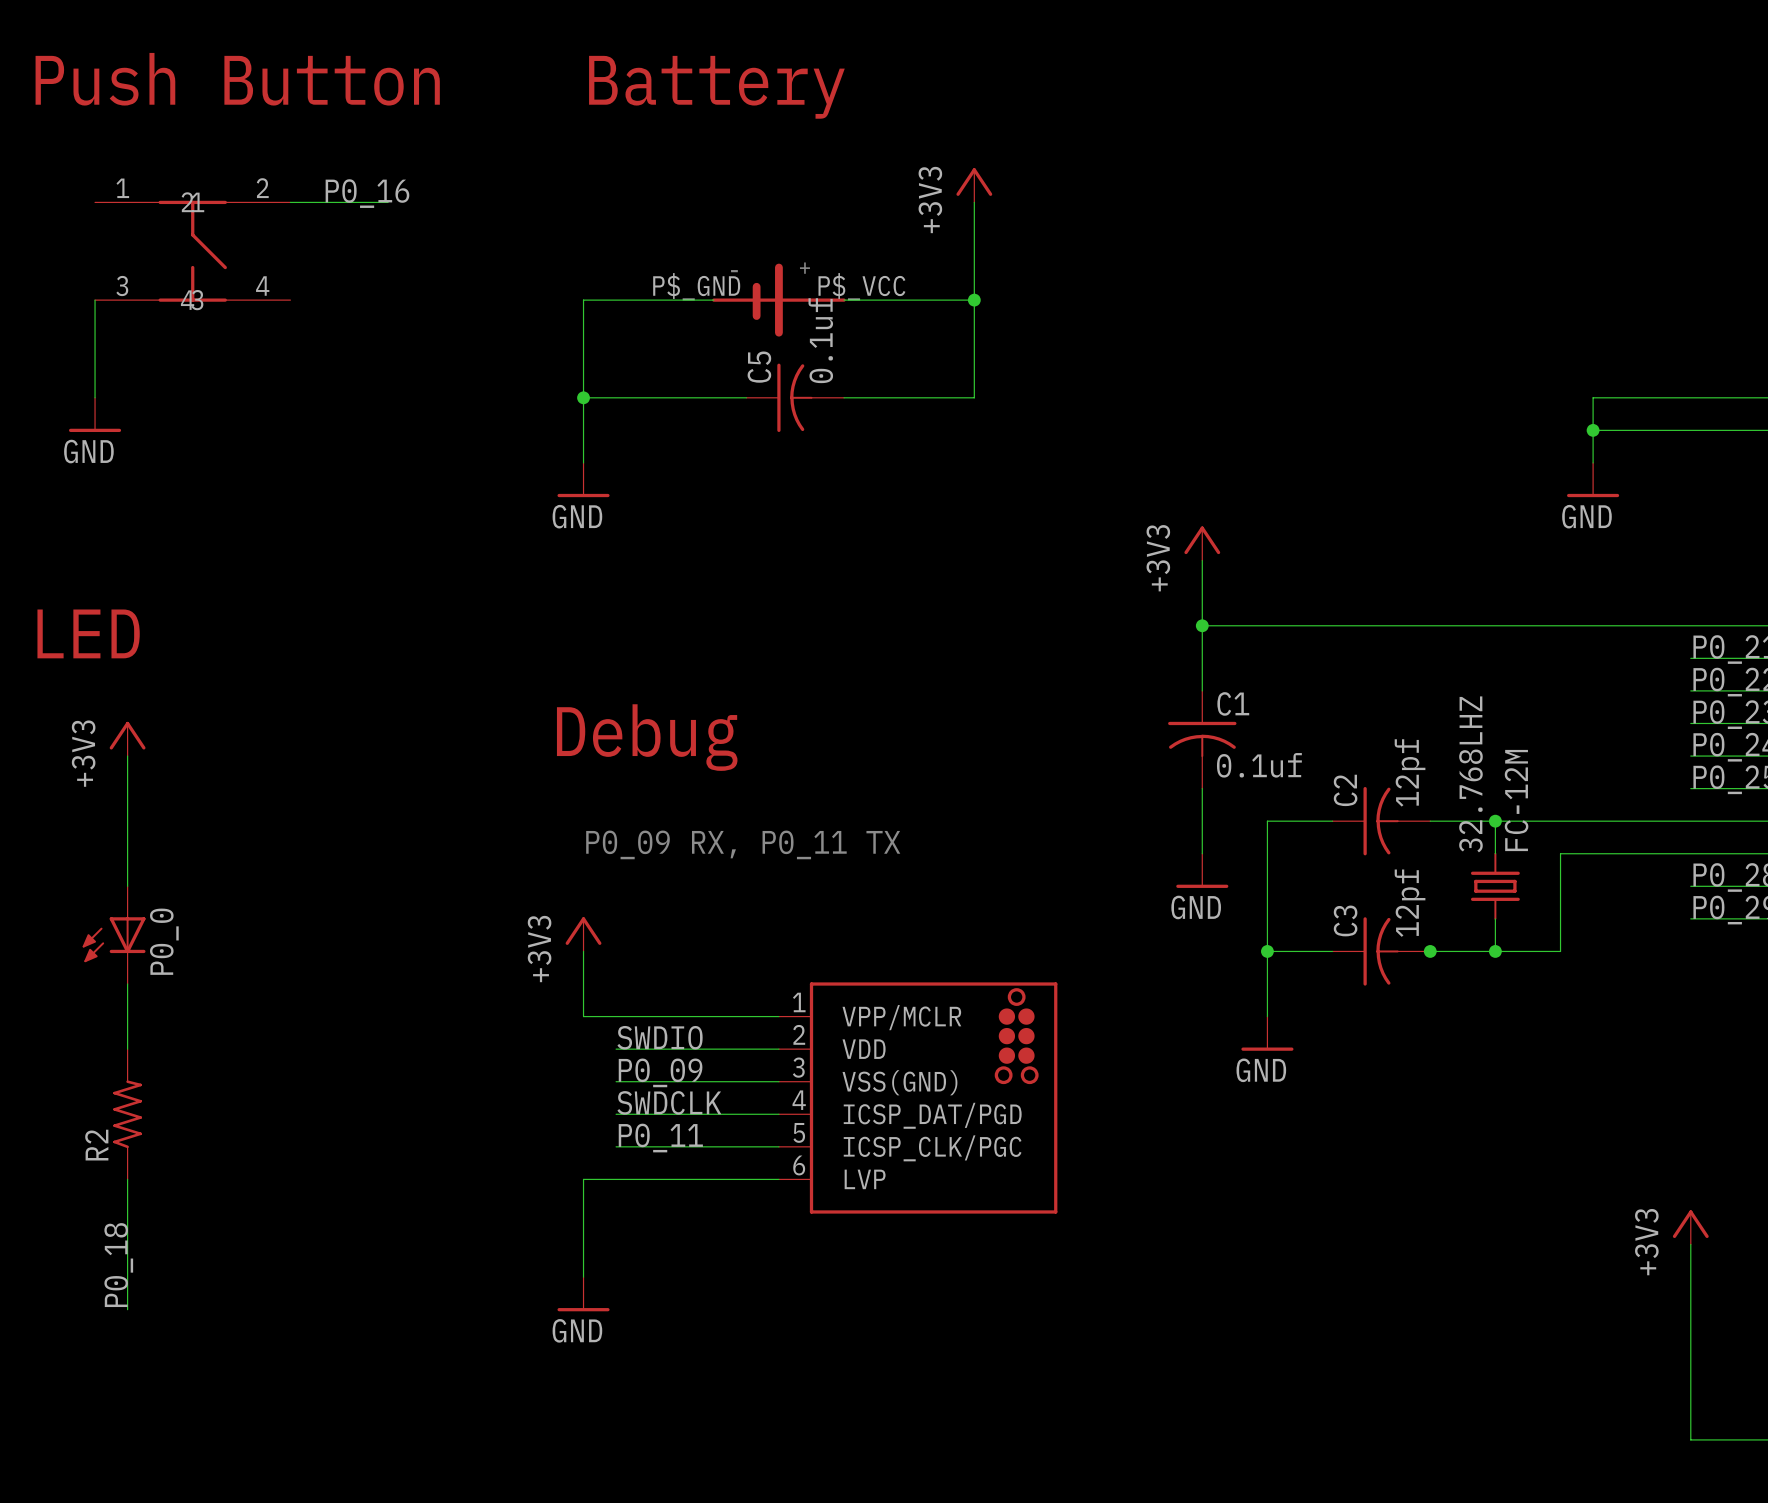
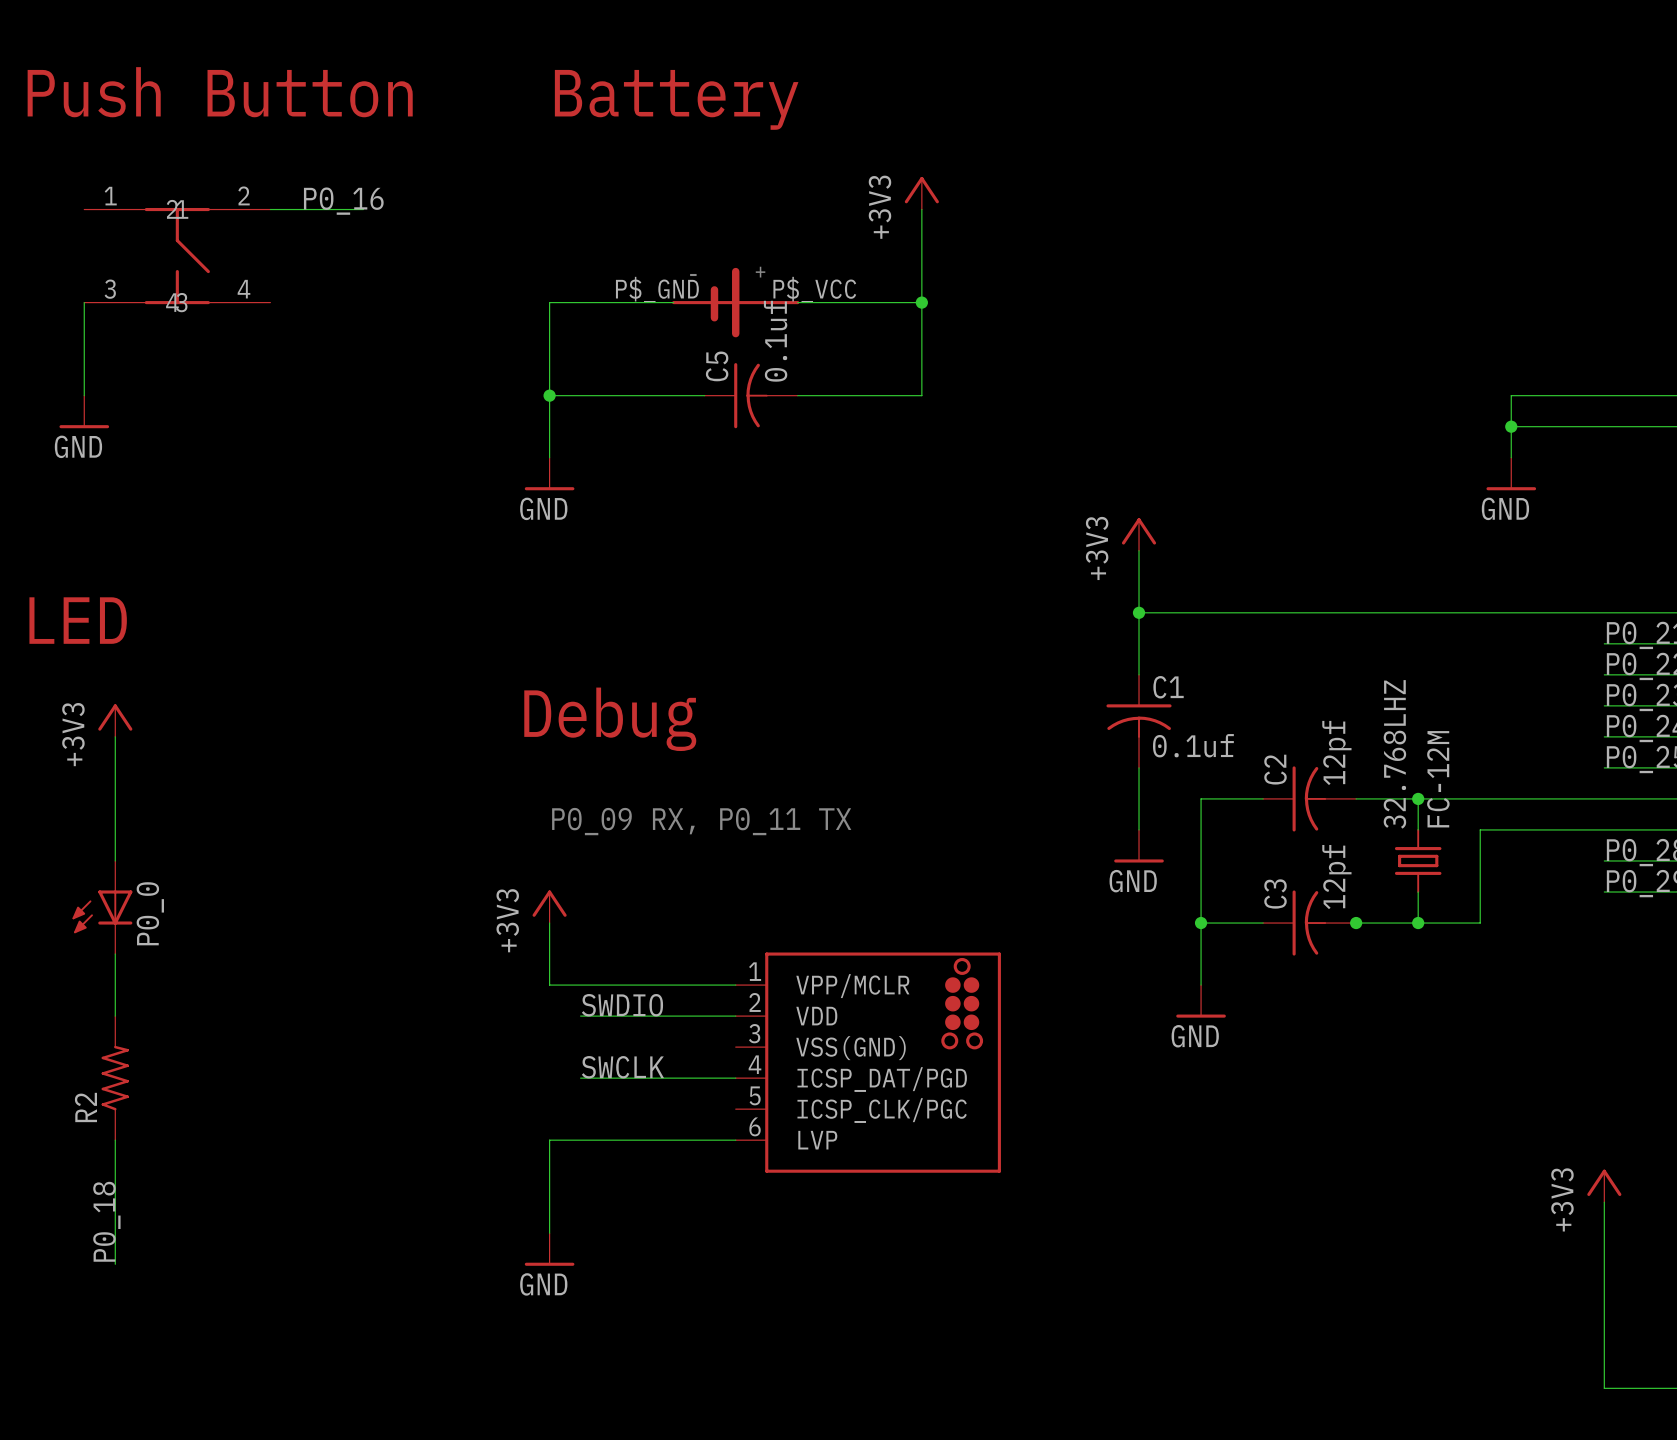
label: P0_09 (660, 1072) -> none
wire: (616, 1081) (778, 1081) -> none
label: SWDCLK (669, 1102) -> SWCLK (622, 1067)
label: P0_11 (660, 1138) -> none
wire: (616, 1146) (778, 1146) -> none

